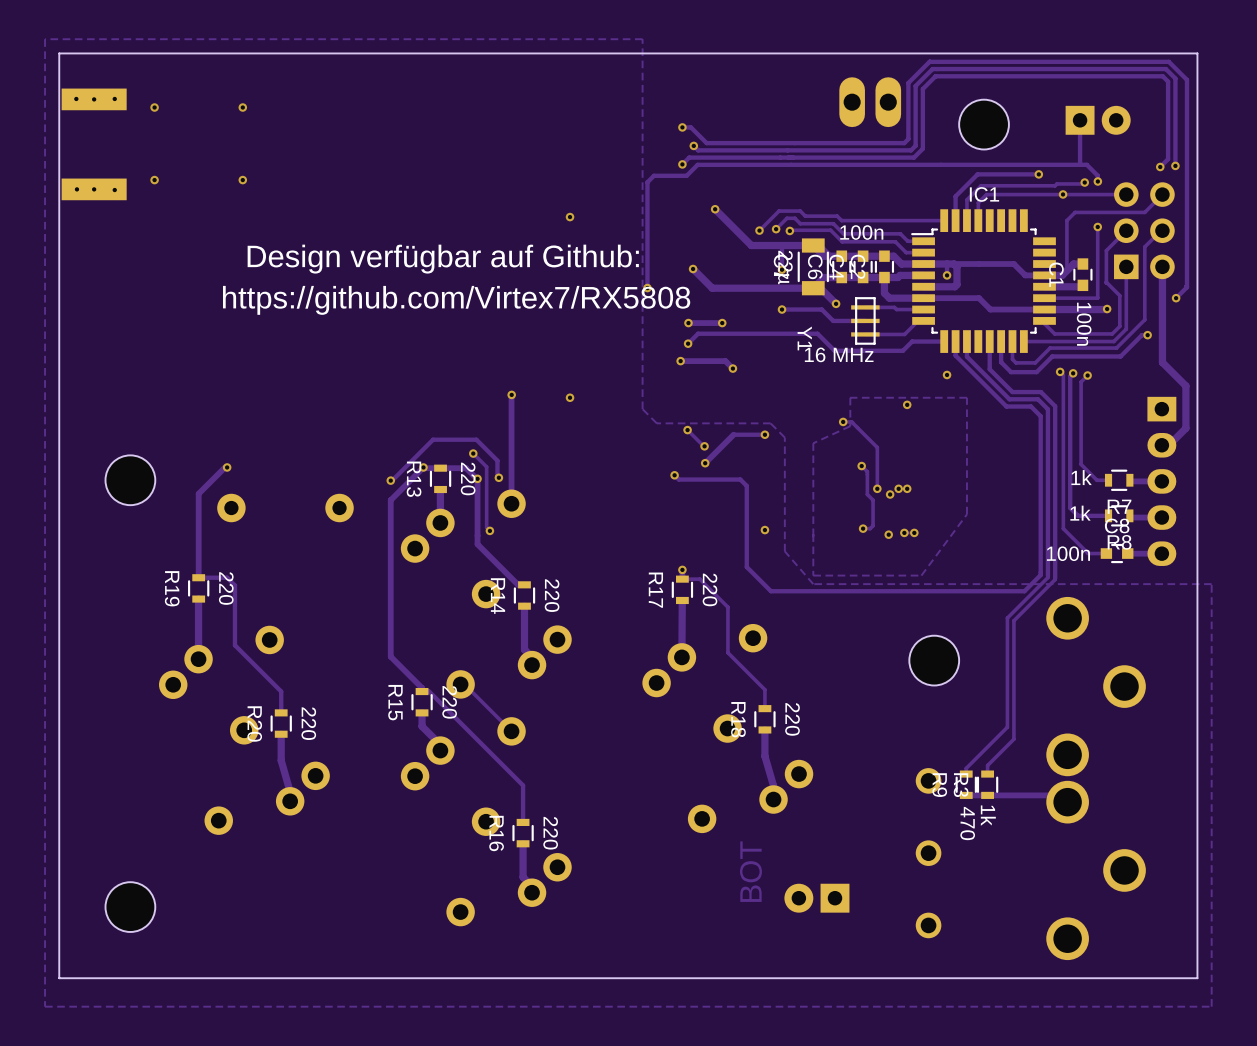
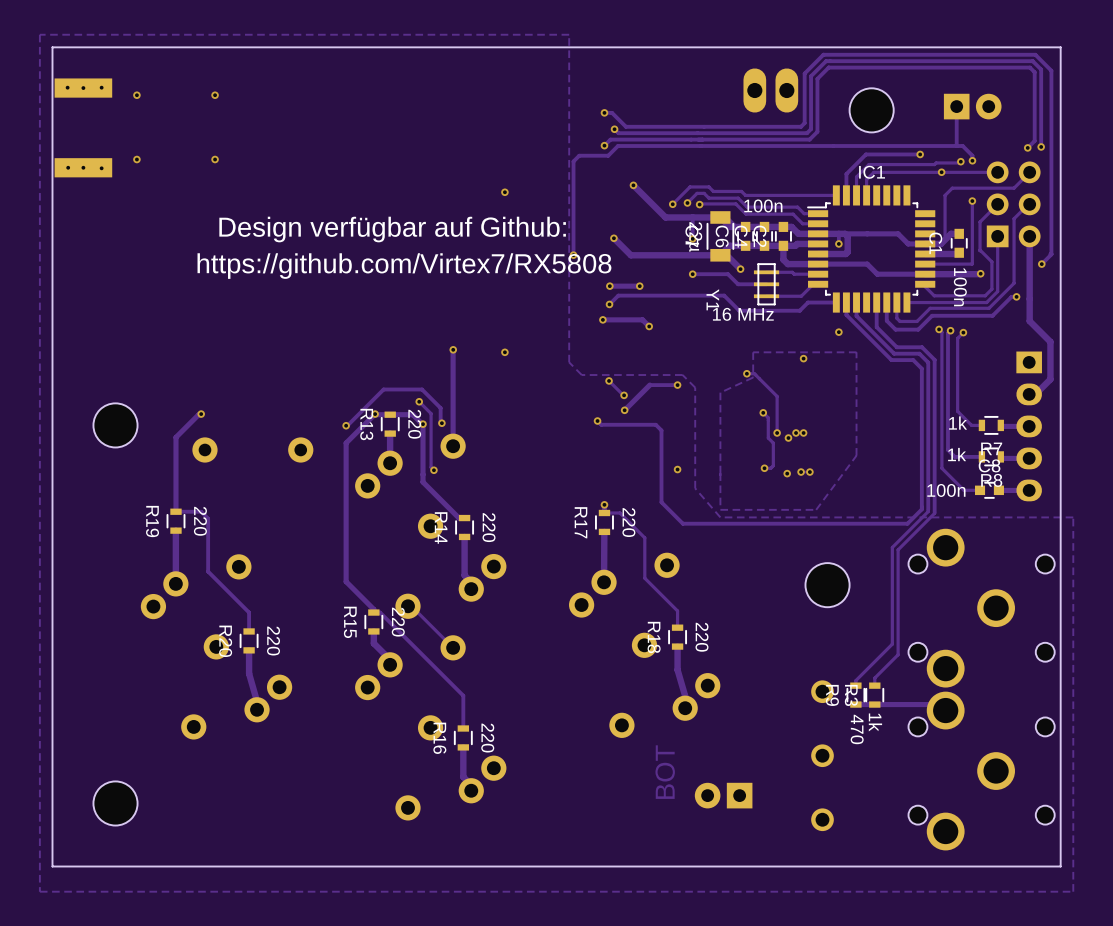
part footprint: [1046, 596, 1146, 777] -> [908, 528, 1055, 688]
part footprint: [1046, 780, 1146, 961] -> [908, 691, 1055, 851]

